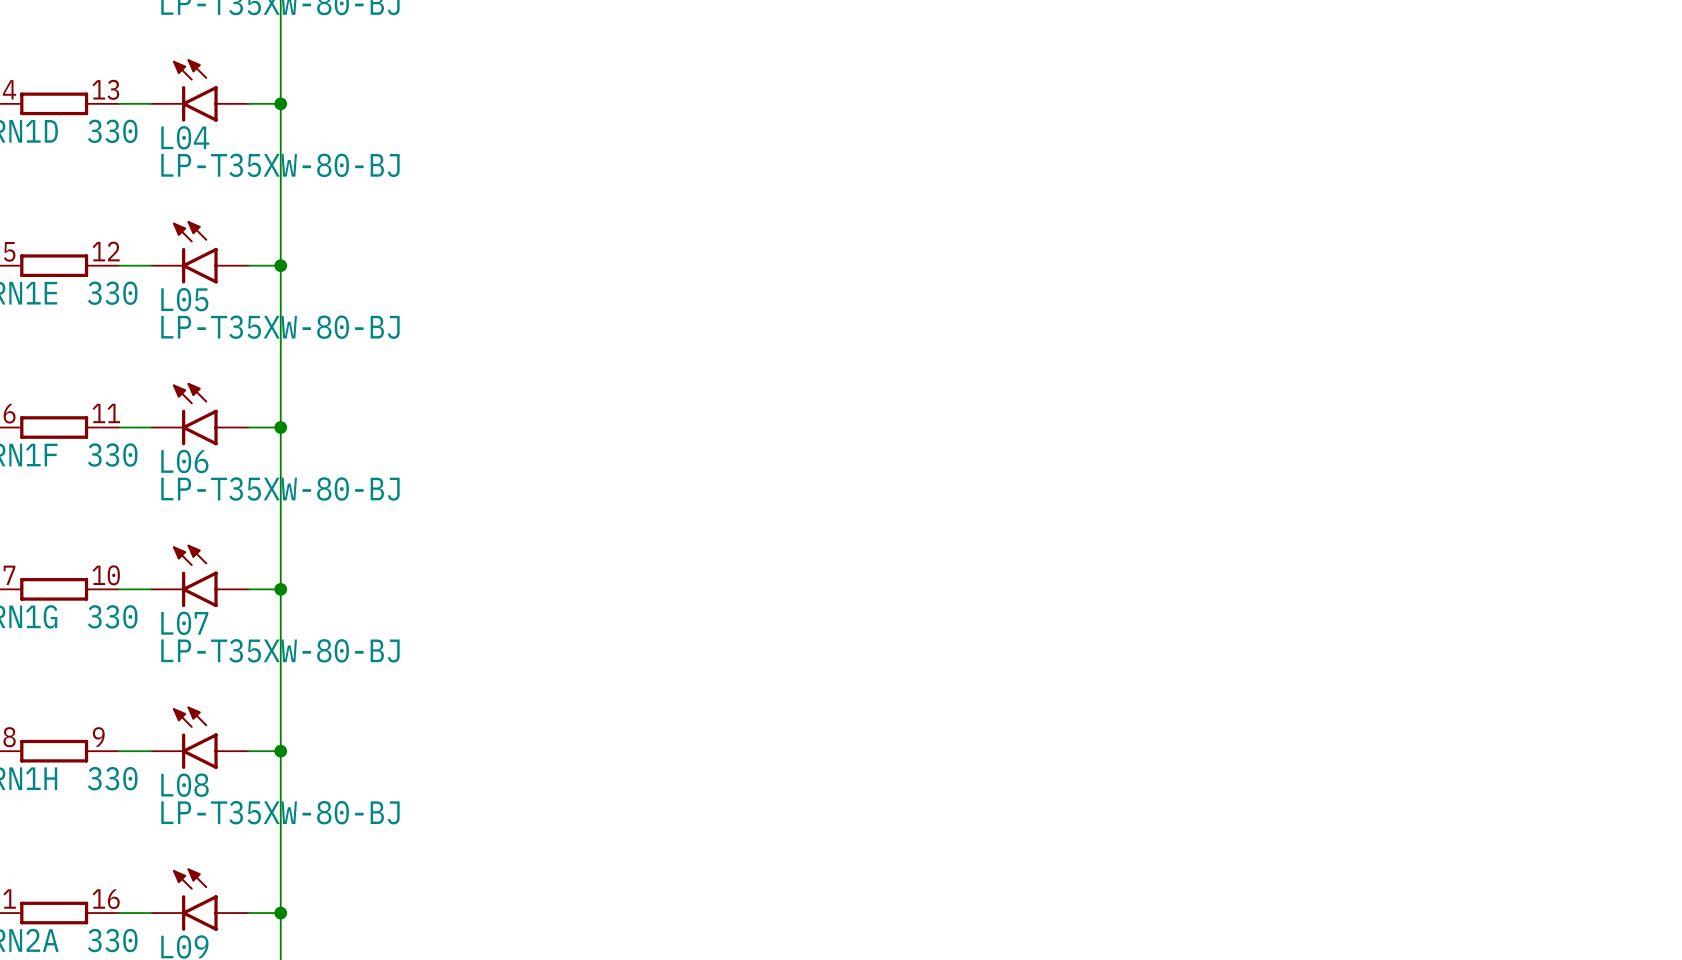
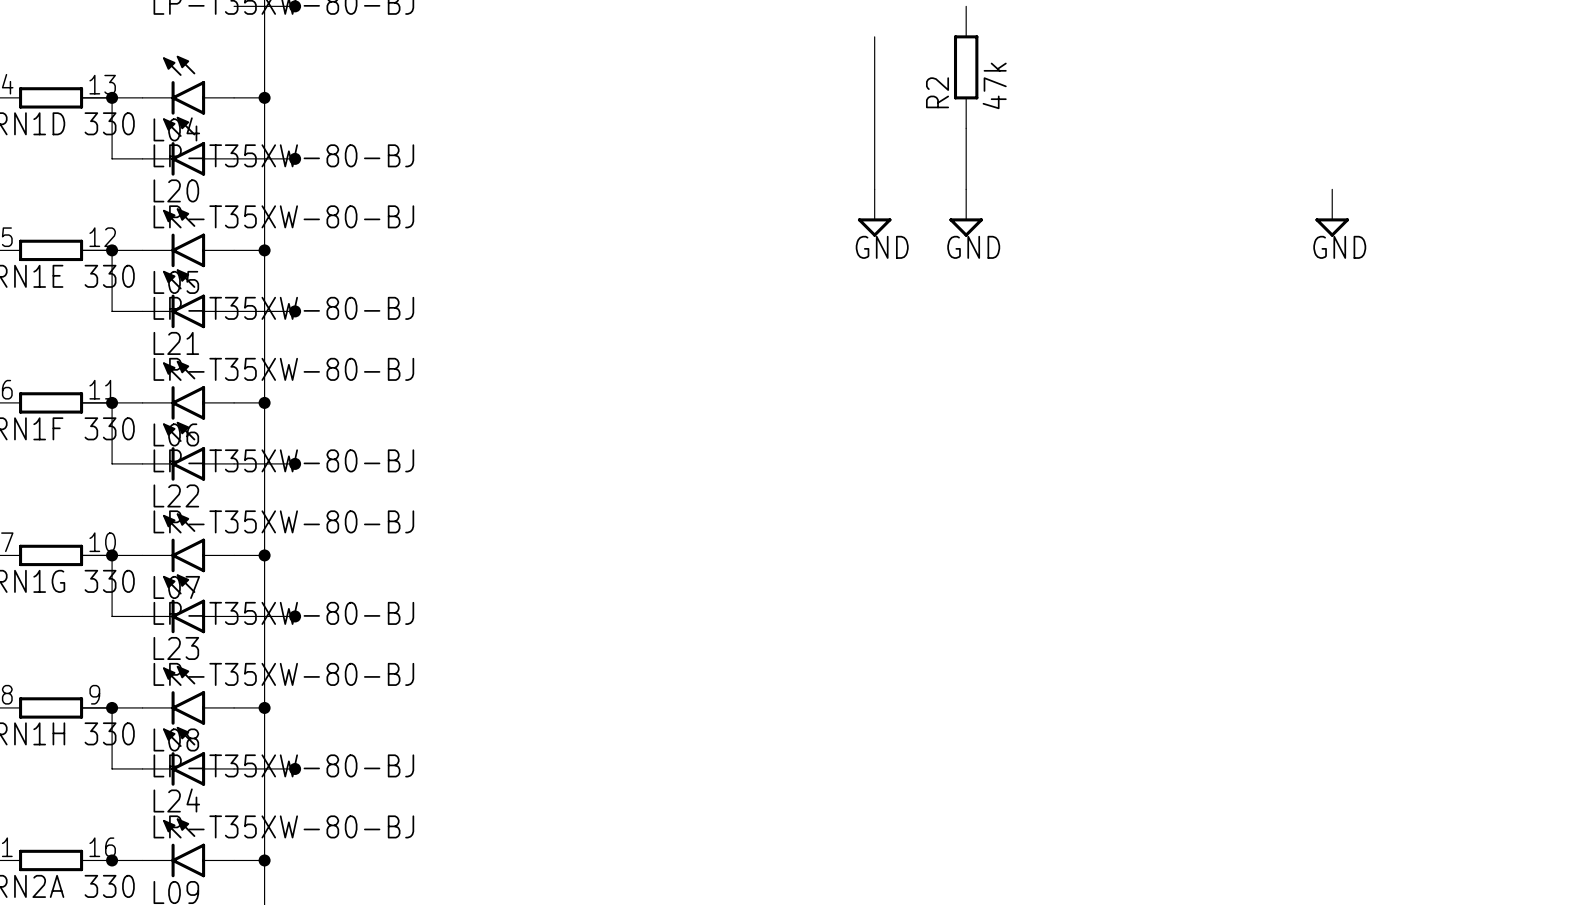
wire: none -> (234, 6) (295, 6)
junction: none -> (295, 6)
wire: none -> (874, 36) (874, 189)
R2: none -> 47k (966, 67)
wire: none -> (81, 97) (112, 97) (112, 158) (142, 158)
junction: none -> (112, 97)
wire: none -> (966, 128) (966, 189)
L20: none -> LP-T35XW-80-BJ (188, 146)
wire: none -> (234, 158) (295, 158)
junction: none -> (295, 158)
power symbol: none -> GND (874, 213)
power symbol: none -> GND (966, 213)
power symbol: none -> GND (1332, 213)
wire: none -> (81, 250) (112, 250) (112, 311) (142, 311)
junction: none -> (112, 250)
L21: none -> LP-T35XW-80-BJ (188, 298)
wire: none -> (234, 311) (295, 311)
junction: none -> (295, 311)
wire: none -> (81, 402) (112, 402) (112, 463) (142, 463)
junction: none -> (112, 402)
L22: none -> LP-T35XW-80-BJ (188, 451)
wire: none -> (234, 463) (295, 463)
junction: none -> (295, 463)
wire: none -> (81, 555) (112, 555) (112, 616) (142, 616)
junction: none -> (112, 555)
L23: none -> LP-T35XW-80-BJ (188, 603)
wire: none -> (234, 616) (295, 616)
junction: none -> (295, 616)
wire: none -> (81, 707) (112, 707) (112, 768) (142, 768)
junction: none -> (112, 707)
L24: none -> LP-T35XW-80-BJ (188, 756)
wire: none -> (234, 768) (295, 768)
junction: none -> (295, 768)
junction: none -> (112, 860)

